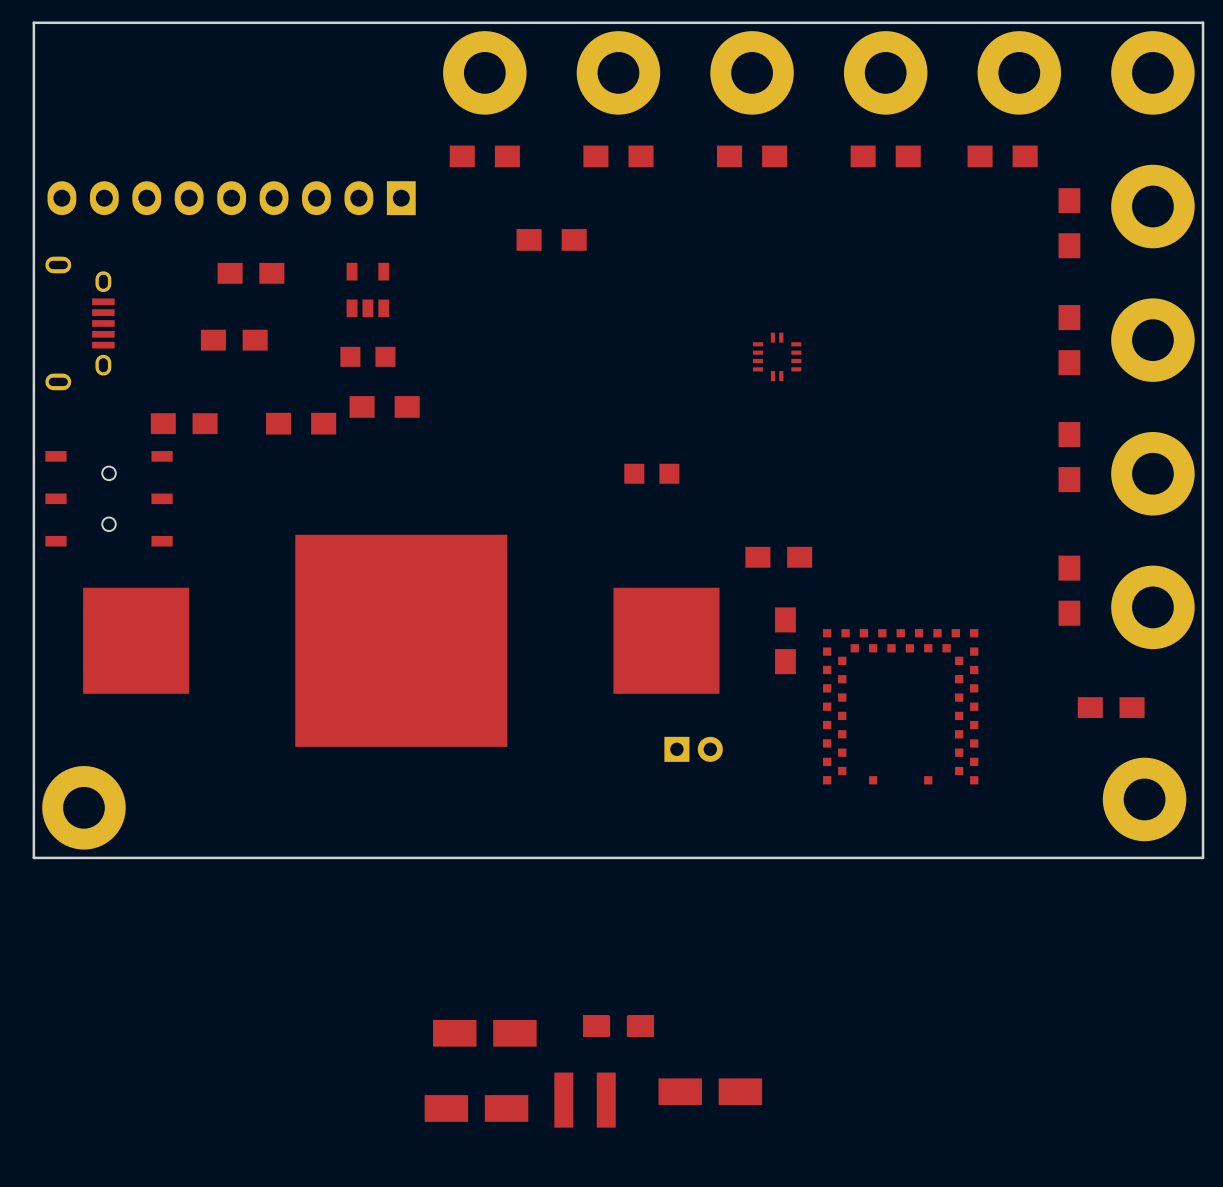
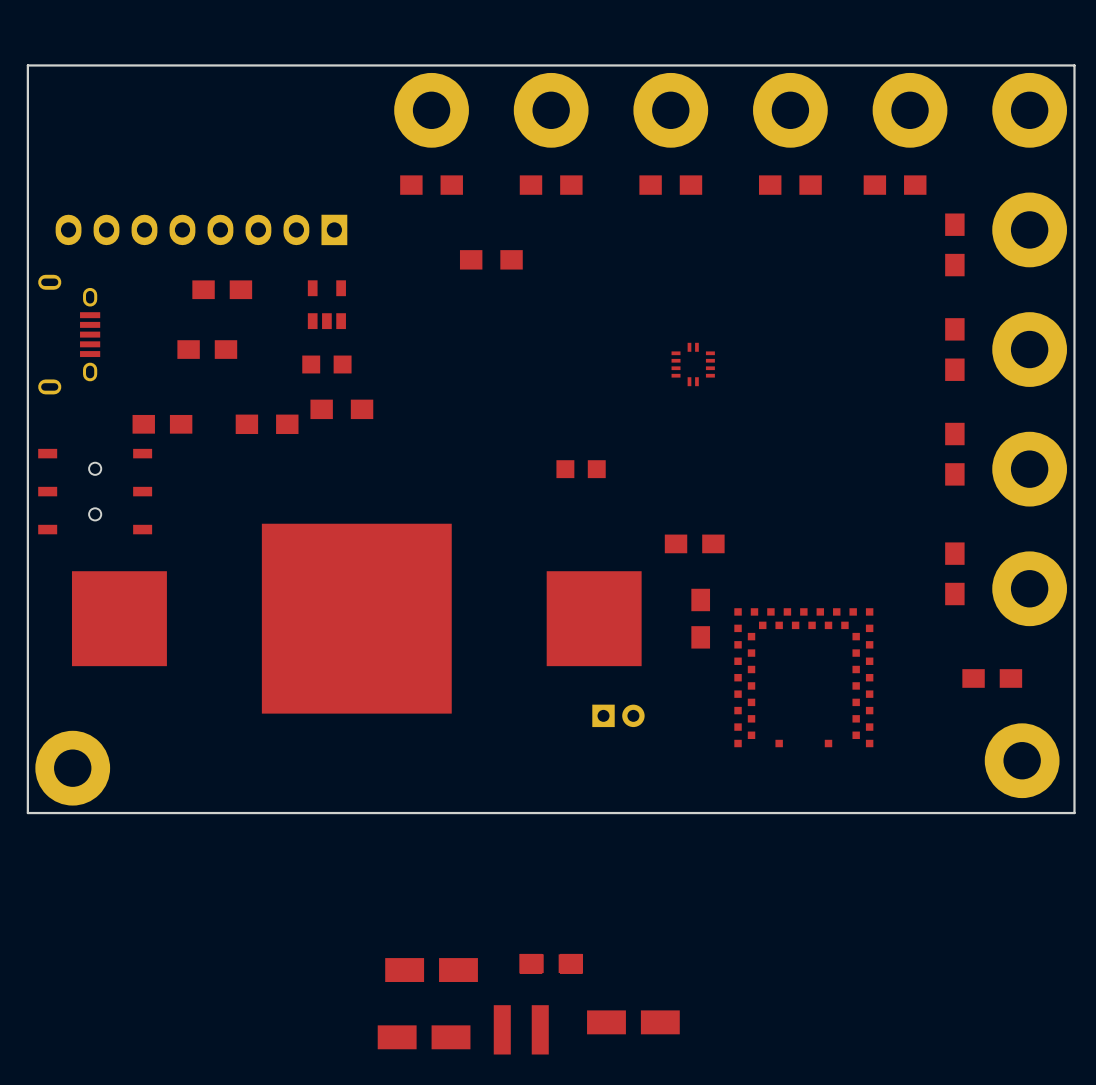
part footprint: [47, 181, 416, 216] -> [55, 214, 348, 246]

